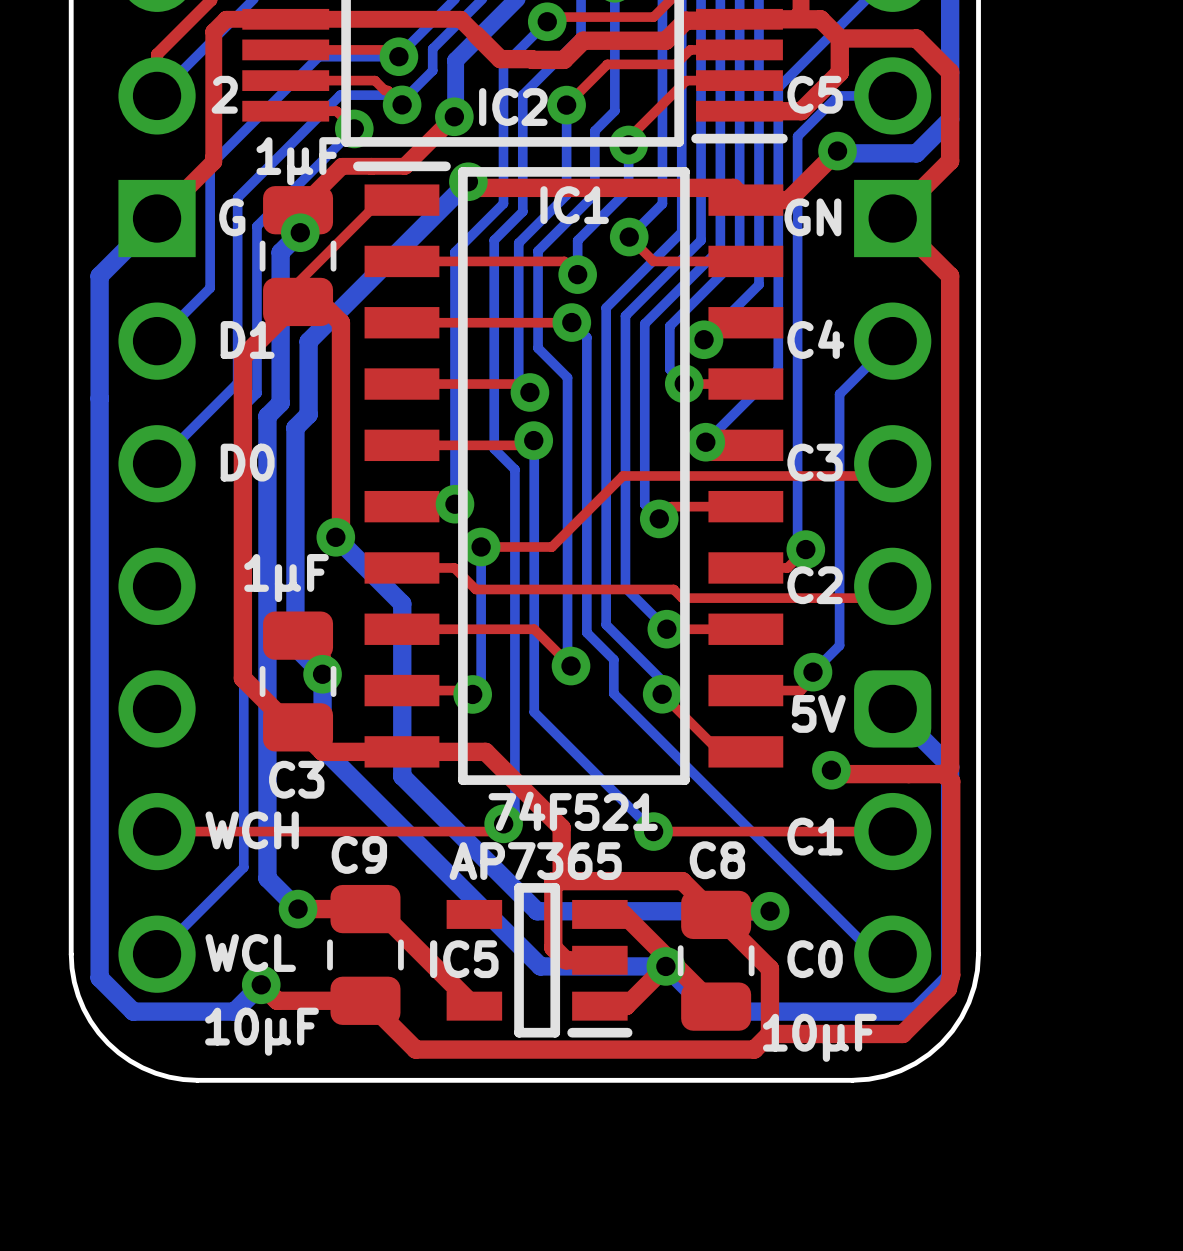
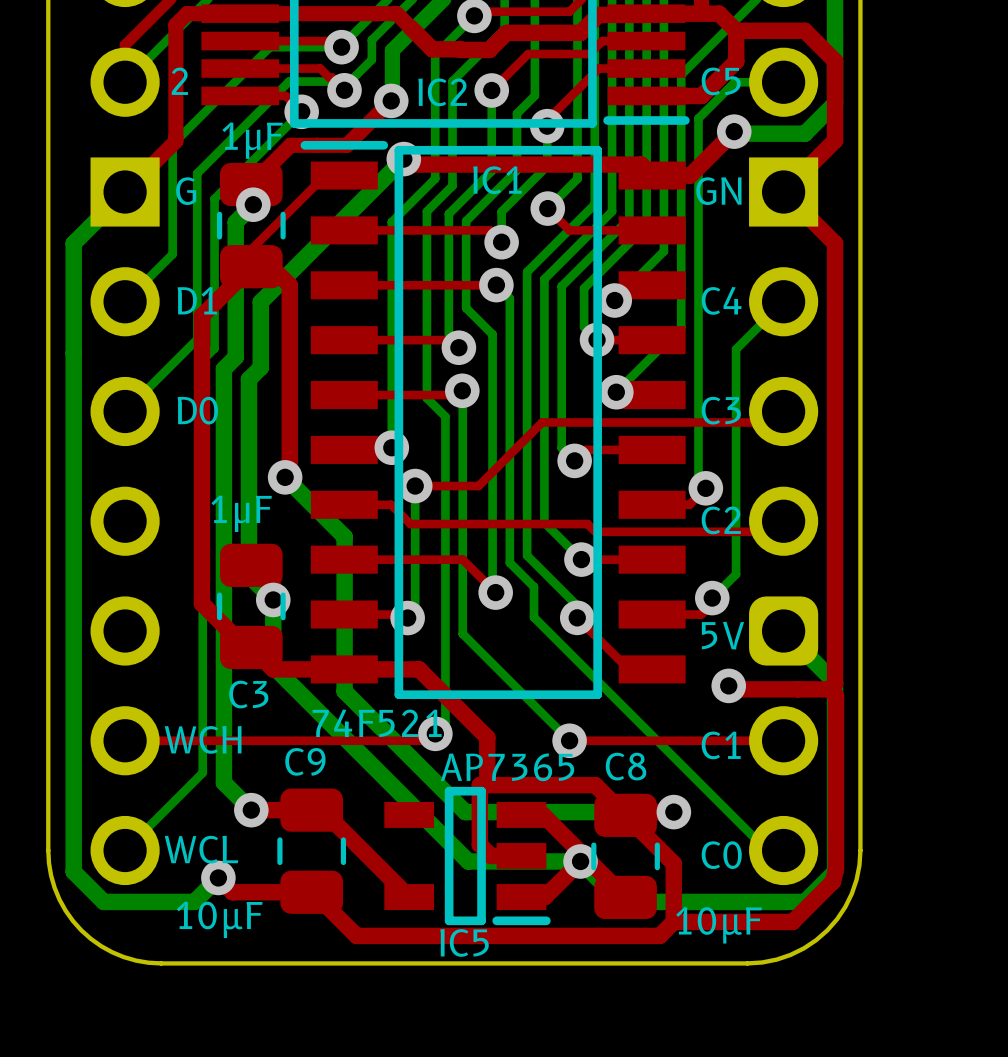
IC1 text position: 74F521 (573, 811) -> 74F521 (377, 723)
IC5 text position: AP7365 (535, 861) -> AP7365 (507, 767)
IC5 name position: IC5 (464, 959) -> IC5 (464, 942)

